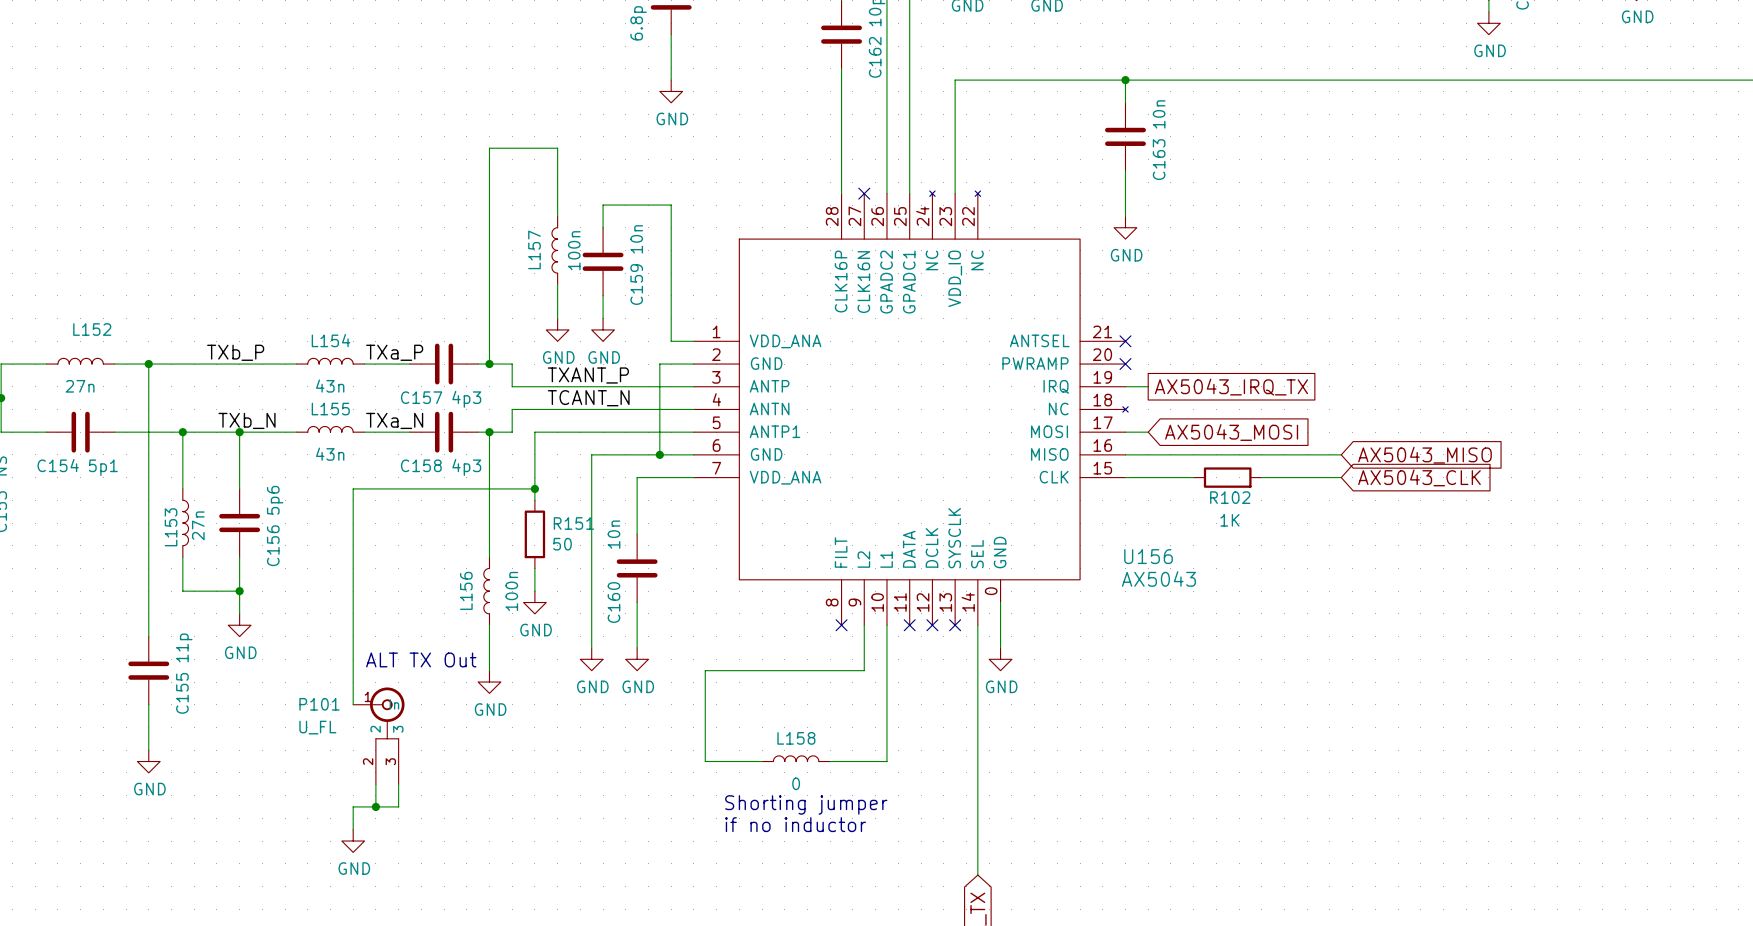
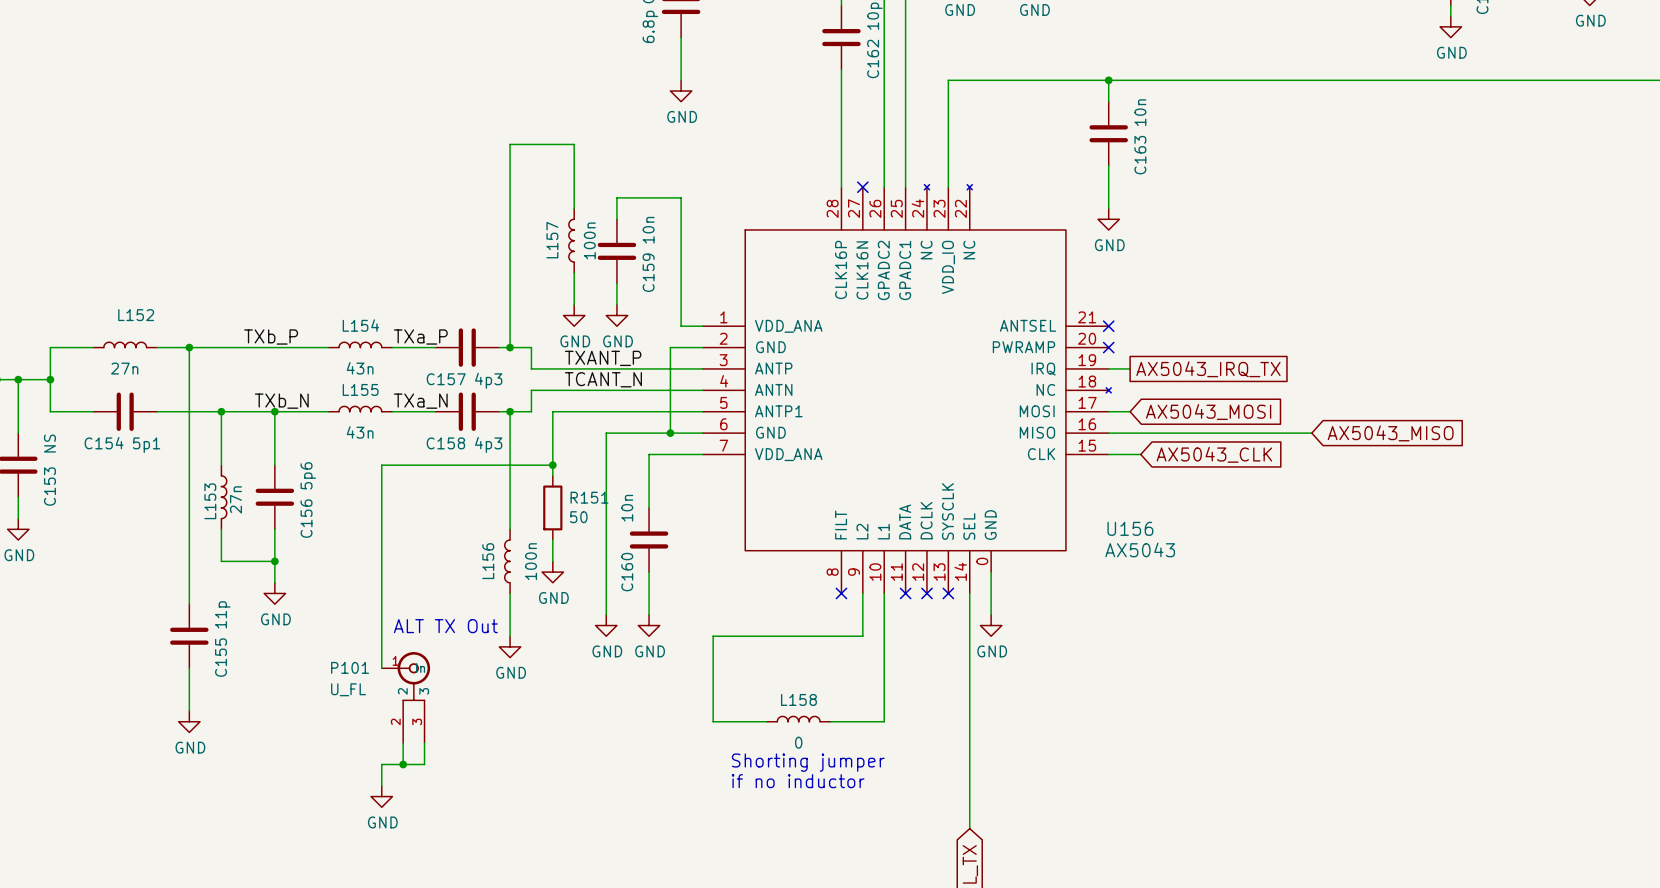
wire: (1159, 477) (1193, 477) -> none
R102: 1K (1227, 477) -> none
wire: (1261, 477) (1341, 477) -> none
global label position: AX5043_CLK (1419, 477) -> AX5043_CLK (1214, 454)

